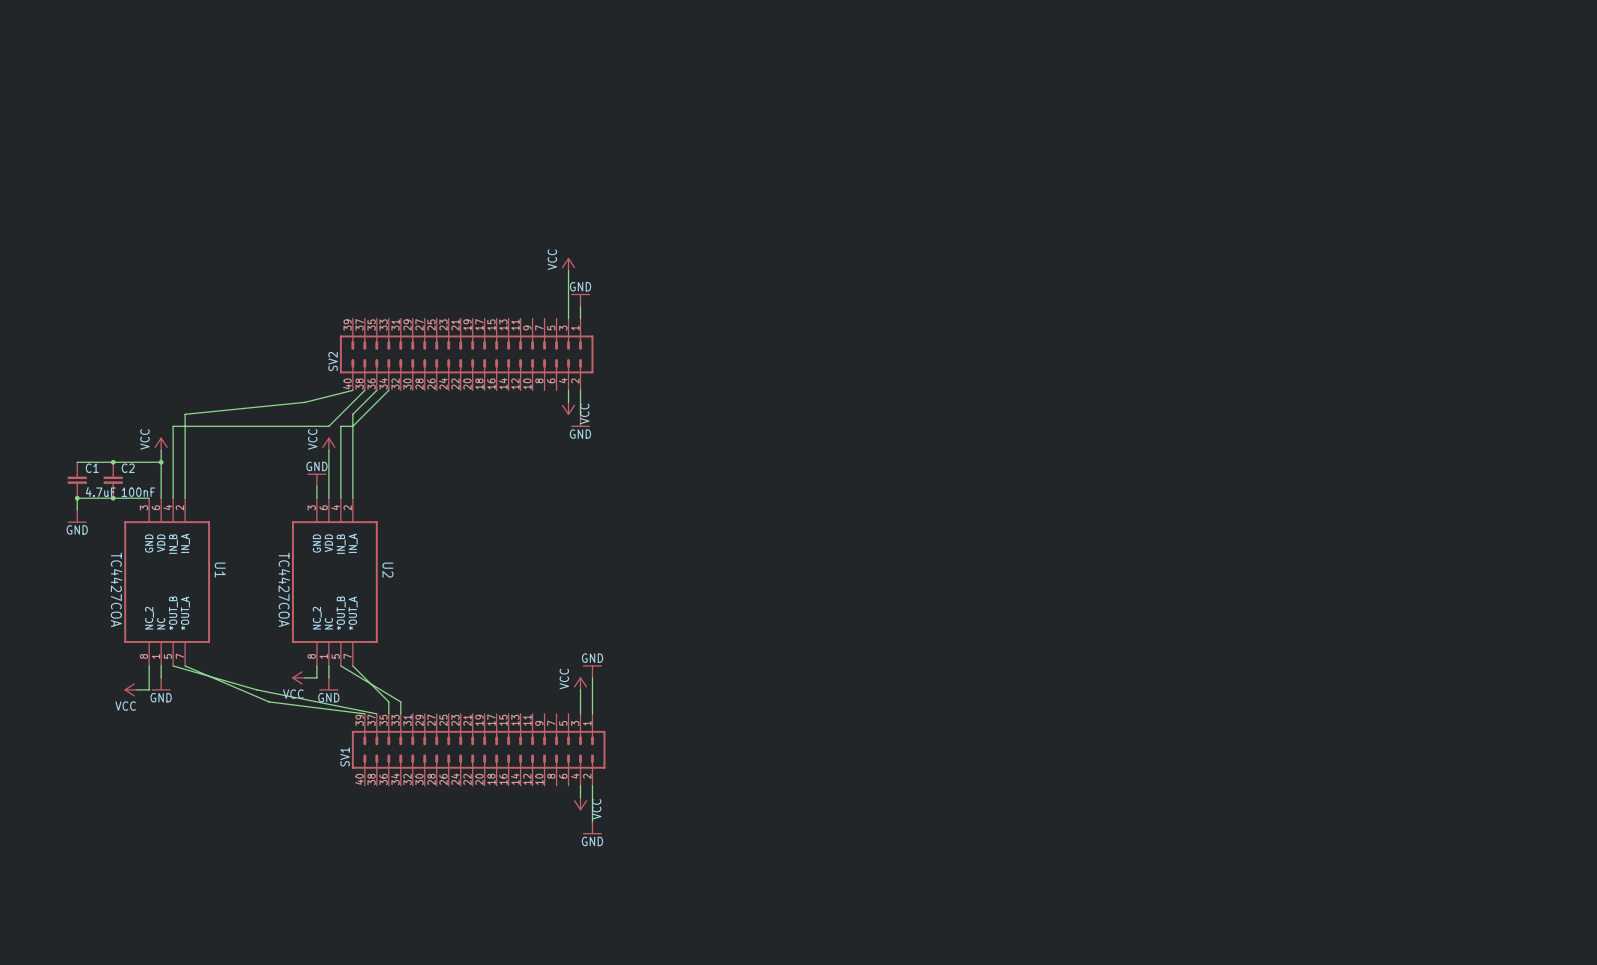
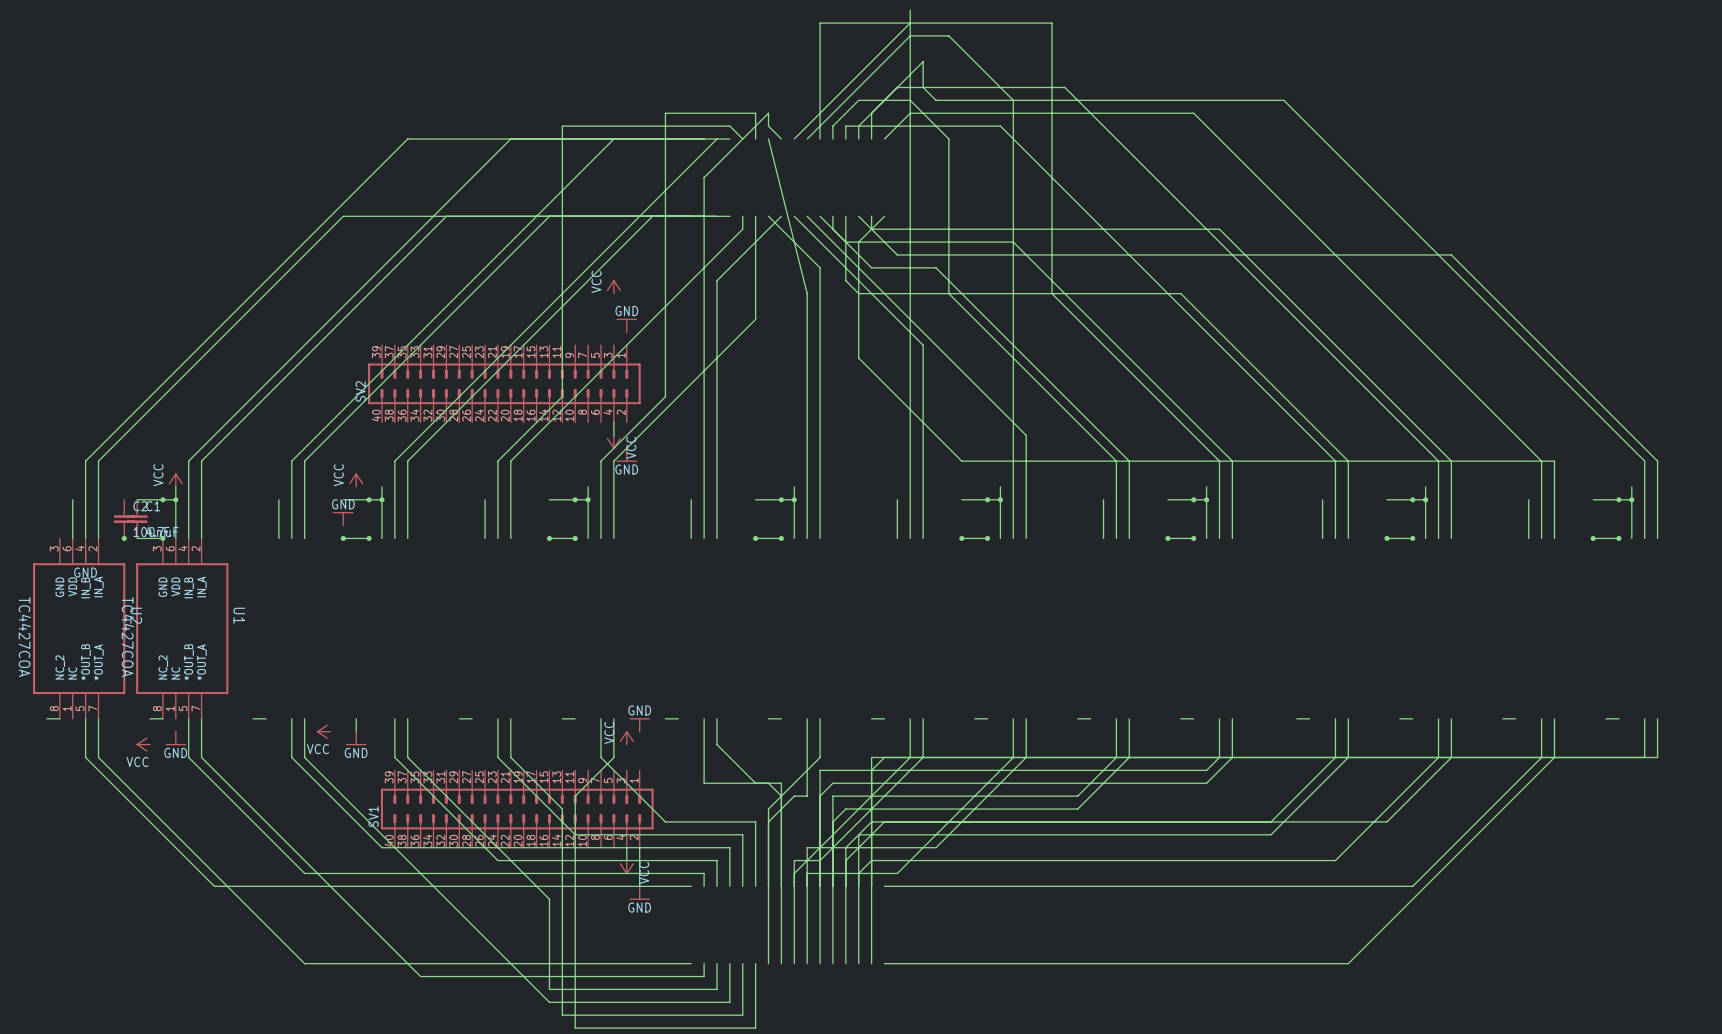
wire: none -> (910, 10) (910, 538)
wire: none -> (910, 23) (794, 139)
wire: none -> (897, 87) (1064, 87) (1438, 461) (1438, 538)
wire: none -> (871, 113) (871, 139)
wire: none -> (613, 139) (291, 461) (291, 538)
wire: none -> (716, 139) (394, 461) (394, 538)
wire: none -> (729, 139) (407, 139) (85, 461) (85, 538)
wire: none -> (742, 139) (729, 126) (562, 126) (562, 396) (497, 461) (497, 538)
wire: none -> (755, 139) (755, 113) (665, 113) (665, 396) (601, 461) (601, 538)
wire: none -> (768, 139) (807, 293) (807, 538)
wire: none -> (781, 139) (768, 126) (768, 113) (704, 177) (704, 538)
wire: none -> (807, 139) (910, 35) (948, 35) (1013, 100) (1013, 538)
wire: none -> (820, 139) (820, 23) (1051, 23) (1051, 293) (1219, 461) (1219, 538)
wire: none -> (832, 139) (832, 126) (858, 100) (910, 100) (948, 139) (948, 293) (1116, 461) (1116, 538)
wire: none -> (845, 139) (845, 126) (1000, 126) (1335, 461) (1335, 538)
wire: none -> (858, 139) (858, 126) (923, 61) (923, 87) (936, 100) (1283, 100) (1644, 461) (1644, 538)
wire: none -> (884, 139) (910, 113) (1193, 113) (1541, 461) (1541, 538)
wire: none -> (549, 216) (304, 461) (304, 538)
wire: none -> (652, 216) (407, 461) (407, 538)
wire: none -> (729, 216) (343, 216) (98, 461) (98, 538)
wire: none -> (742, 216) (742, 229) (510, 461) (510, 538)
wire: none -> (755, 216) (755, 319) (613, 461) (613, 538)
wire: none -> (768, 216) (820, 267) (820, 538)
wire: none -> (781, 216) (716, 280) (716, 538)
wire: none -> (794, 216) (923, 345) (923, 538)
wire: none -> (807, 216) (1026, 435) (1026, 538)
wire: none -> (820, 216) (871, 267) (936, 267) (1129, 461) (1129, 538)
wire: none -> (832, 216) (832, 229)
wire: none -> (845, 216) (845, 280) (858, 293) (1180, 293) (1348, 461) (1348, 538)
wire: none -> (858, 216) (897, 254) (1451, 254) (1657, 461) (1657, 538)
wire: none -> (871, 216) (871, 229) (1219, 229) (1451, 461) (1451, 538)
wire: none -> (884, 216) (858, 242) (858, 358) (961, 461) (1554, 461) (1554, 538)
wire: none -> (845, 242) (1013, 242) (1232, 461) (1232, 538)
wire: (568, 270) (568, 318) -> none
wire: (580, 306) (580, 318) -> none
wire: (352, 390) (304, 402) (185, 414) (185, 426) -> (446, 216) (201, 461)
wire: (364, 390) (328, 426) (173, 426) -> (510, 139) (188, 461)
wire: (376, 390) (352, 414) (352, 450) -> none
wire: (388, 390) (352, 426) (340, 426) (340, 498) -> none
wire: (580, 390) (580, 414) -> none
wire: (328, 450) (328, 498) -> none
wire: none -> (588, 486) (588, 538)
wire: none -> (794, 486) (794, 538)
wire: none -> (1000, 486) (1000, 538)
wire: none -> (1206, 486) (1206, 538)
wire: none -> (1425, 486) (1425, 538)
wire: none -> (1631, 486) (1631, 538)
wire: none -> (72, 499) (72, 538)
wire: (77, 462) (125, 462) -> none
junction: (113, 462) -> none
junction: none -> (162, 499)
wire: none -> (278, 499) (278, 538)
wire: none -> (343, 499) (381, 499)
junction: none -> (369, 499)
junction: none -> (381, 499)
wire: none -> (485, 499) (485, 538)
wire: none -> (549, 499) (588, 499)
junction: none -> (575, 499)
junction: none -> (588, 499)
wire: none -> (691, 499) (691, 538)
wire: none -> (755, 499) (794, 499)
junction: none -> (781, 499)
junction: none -> (794, 499)
wire: none -> (897, 499) (897, 538)
wire: none -> (961, 499) (1000, 499)
junction: none -> (987, 499)
junction: none -> (1000, 499)
wire: none -> (1103, 499) (1103, 538)
wire: none -> (1167, 499) (1206, 499)
junction: none -> (1193, 499)
junction: none -> (1206, 499)
wire: none -> (1322, 499) (1322, 538)
wire: none -> (1386, 499) (1425, 499)
junction: none -> (1412, 499)
junction: none -> (1425, 499)
wire: none -> (1528, 499) (1528, 538)
wire: none -> (1593, 499) (1631, 499)
junction: none -> (1618, 499)
junction: none -> (1631, 499)
C1 position: (77, 480) -> (137, 519)
wire: (316, 486) (316, 498) -> (369, 538) (343, 538)
junction: (77, 498) -> none
wire: (125, 498) (77, 498) (77, 510) -> none
junction: none -> (162, 538)
junction: none -> (343, 538)
junction: none -> (369, 538)
wire: none -> (549, 538) (575, 538)
junction: none -> (549, 538)
junction: none -> (575, 538)
wire: none -> (755, 538) (781, 538)
junction: none -> (755, 538)
junction: none -> (781, 538)
wire: none -> (961, 538) (987, 538)
junction: none -> (961, 538)
junction: none -> (987, 538)
wire: none -> (1167, 538) (1193, 538)
junction: none -> (1167, 538)
junction: none -> (1193, 538)
wire: none -> (1386, 538) (1412, 538)
junction: none -> (1386, 538)
junction: none -> (1412, 538)
wire: none -> (1593, 538) (1618, 538)
junction: none -> (1593, 538)
junction: none -> (1618, 538)
U2 position: (334, 582) -> (79, 628)
wire: none -> (46, 718) (59, 718)
wire: none -> (85, 718) (85, 757) (214, 886) (691, 886)
wire: none -> (98, 718) (98, 757) (304, 963) (691, 963)
wire: (149, 665) (149, 689) (137, 689) -> (162, 718) (150, 718)
wire: (161, 665) (161, 677) -> none
wire: (173, 665) (257, 689) (376, 713) -> (188, 718) (188, 757) (304, 873) (704, 873) (704, 886)
wire: (185, 665) (268, 701) (364, 713) -> (201, 718) (201, 757) (420, 976) (704, 976) (704, 963)
wire: none -> (253, 718) (266, 718)
wire: none -> (291, 718) (291, 757) (381, 847) (729, 847) (729, 886)
wire: none -> (304, 718) (304, 757) (549, 1002) (729, 1002) (729, 963)
wire: (316, 665) (316, 677) (304, 677) -> none
wire: (340, 665) (400, 701) (400, 713) -> none
wire: (352, 665) (388, 701) (388, 713) -> none
wire: none -> (394, 718) (394, 757) (497, 860) (716, 860) (716, 886)
wire: none -> (407, 718) (407, 757) (549, 899) (549, 989) (716, 989) (716, 963)
wire: none -> (459, 718) (472, 718)
wire: none -> (497, 718) (497, 757) (575, 834) (742, 834) (742, 886)
wire: none -> (510, 718) (510, 757) (562, 809) (562, 1015) (742, 1015) (742, 963)
wire: none -> (562, 718) (575, 718)
wire: none -> (601, 718) (601, 757) (665, 821) (755, 821) (755, 886)
wire: none -> (613, 718) (613, 757) (575, 796) (575, 1028) (755, 1028) (755, 963)
wire: none -> (665, 718) (678, 718)
wire: none -> (704, 718) (704, 783) (781, 783) (781, 963)
wire: none -> (716, 718) (716, 744) (755, 783)
wire: none -> (768, 718) (781, 718)
wire: none -> (807, 718) (807, 796) (794, 796) (768, 821)
wire: none -> (820, 718) (820, 757) (768, 809) (768, 963)
wire: none -> (871, 718) (884, 718)
wire: none -> (910, 718) (910, 757) (794, 873)
wire: none -> (923, 718) (923, 757) (820, 860) (794, 860) (794, 963)
wire: none -> (974, 718) (987, 718)
wire: none -> (1013, 718) (1013, 757) (897, 873) (807, 873)
wire: none -> (1026, 718) (1026, 757) (936, 847) (807, 847) (807, 963)
wire: none -> (1077, 718) (1090, 718)
wire: none -> (1116, 718) (1116, 757) (1077, 796) (832, 796) (832, 963)
wire: none -> (1129, 718) (1129, 757) (1077, 809) (845, 809) (832, 821)
wire: none -> (1180, 718) (1193, 718)
wire: none -> (1219, 718) (1219, 757) (1206, 770) (820, 770) (820, 963)
wire: none -> (1232, 718) (1232, 757) (1206, 783) (832, 783) (820, 796)
wire: none -> (1296, 718) (1309, 718)
wire: none -> (1335, 718) (1335, 757) (1271, 821)
wire: none -> (1348, 718) (1348, 757) (1271, 834) (858, 834) (858, 963)
wire: none -> (1399, 718) (1412, 718)
wire: none -> (1438, 718) (1438, 757) (1335, 860) (871, 860) (858, 873)
wire: none -> (1451, 718) (1451, 757) (1386, 821) (871, 821) (845, 847) (845, 963)
wire: none -> (1502, 718) (1515, 718)
wire: none -> (1541, 718) (1541, 757) (1412, 886) (884, 886)
wire: none -> (1554, 718) (1554, 757) (1348, 963) (884, 963)
wire: none -> (1606, 718) (1618, 718)
wire: none -> (1644, 718) (1644, 757)
wire: none -> (1657, 718) (1657, 757) (871, 757) (871, 963)
wire: (592, 677) (592, 713) -> none
wire: (580, 689) (580, 713) -> none
wire: none -> (884, 757) (871, 770)
wire: none -> (768, 783) (781, 796)
wire: none -> (884, 821) (845, 860)

